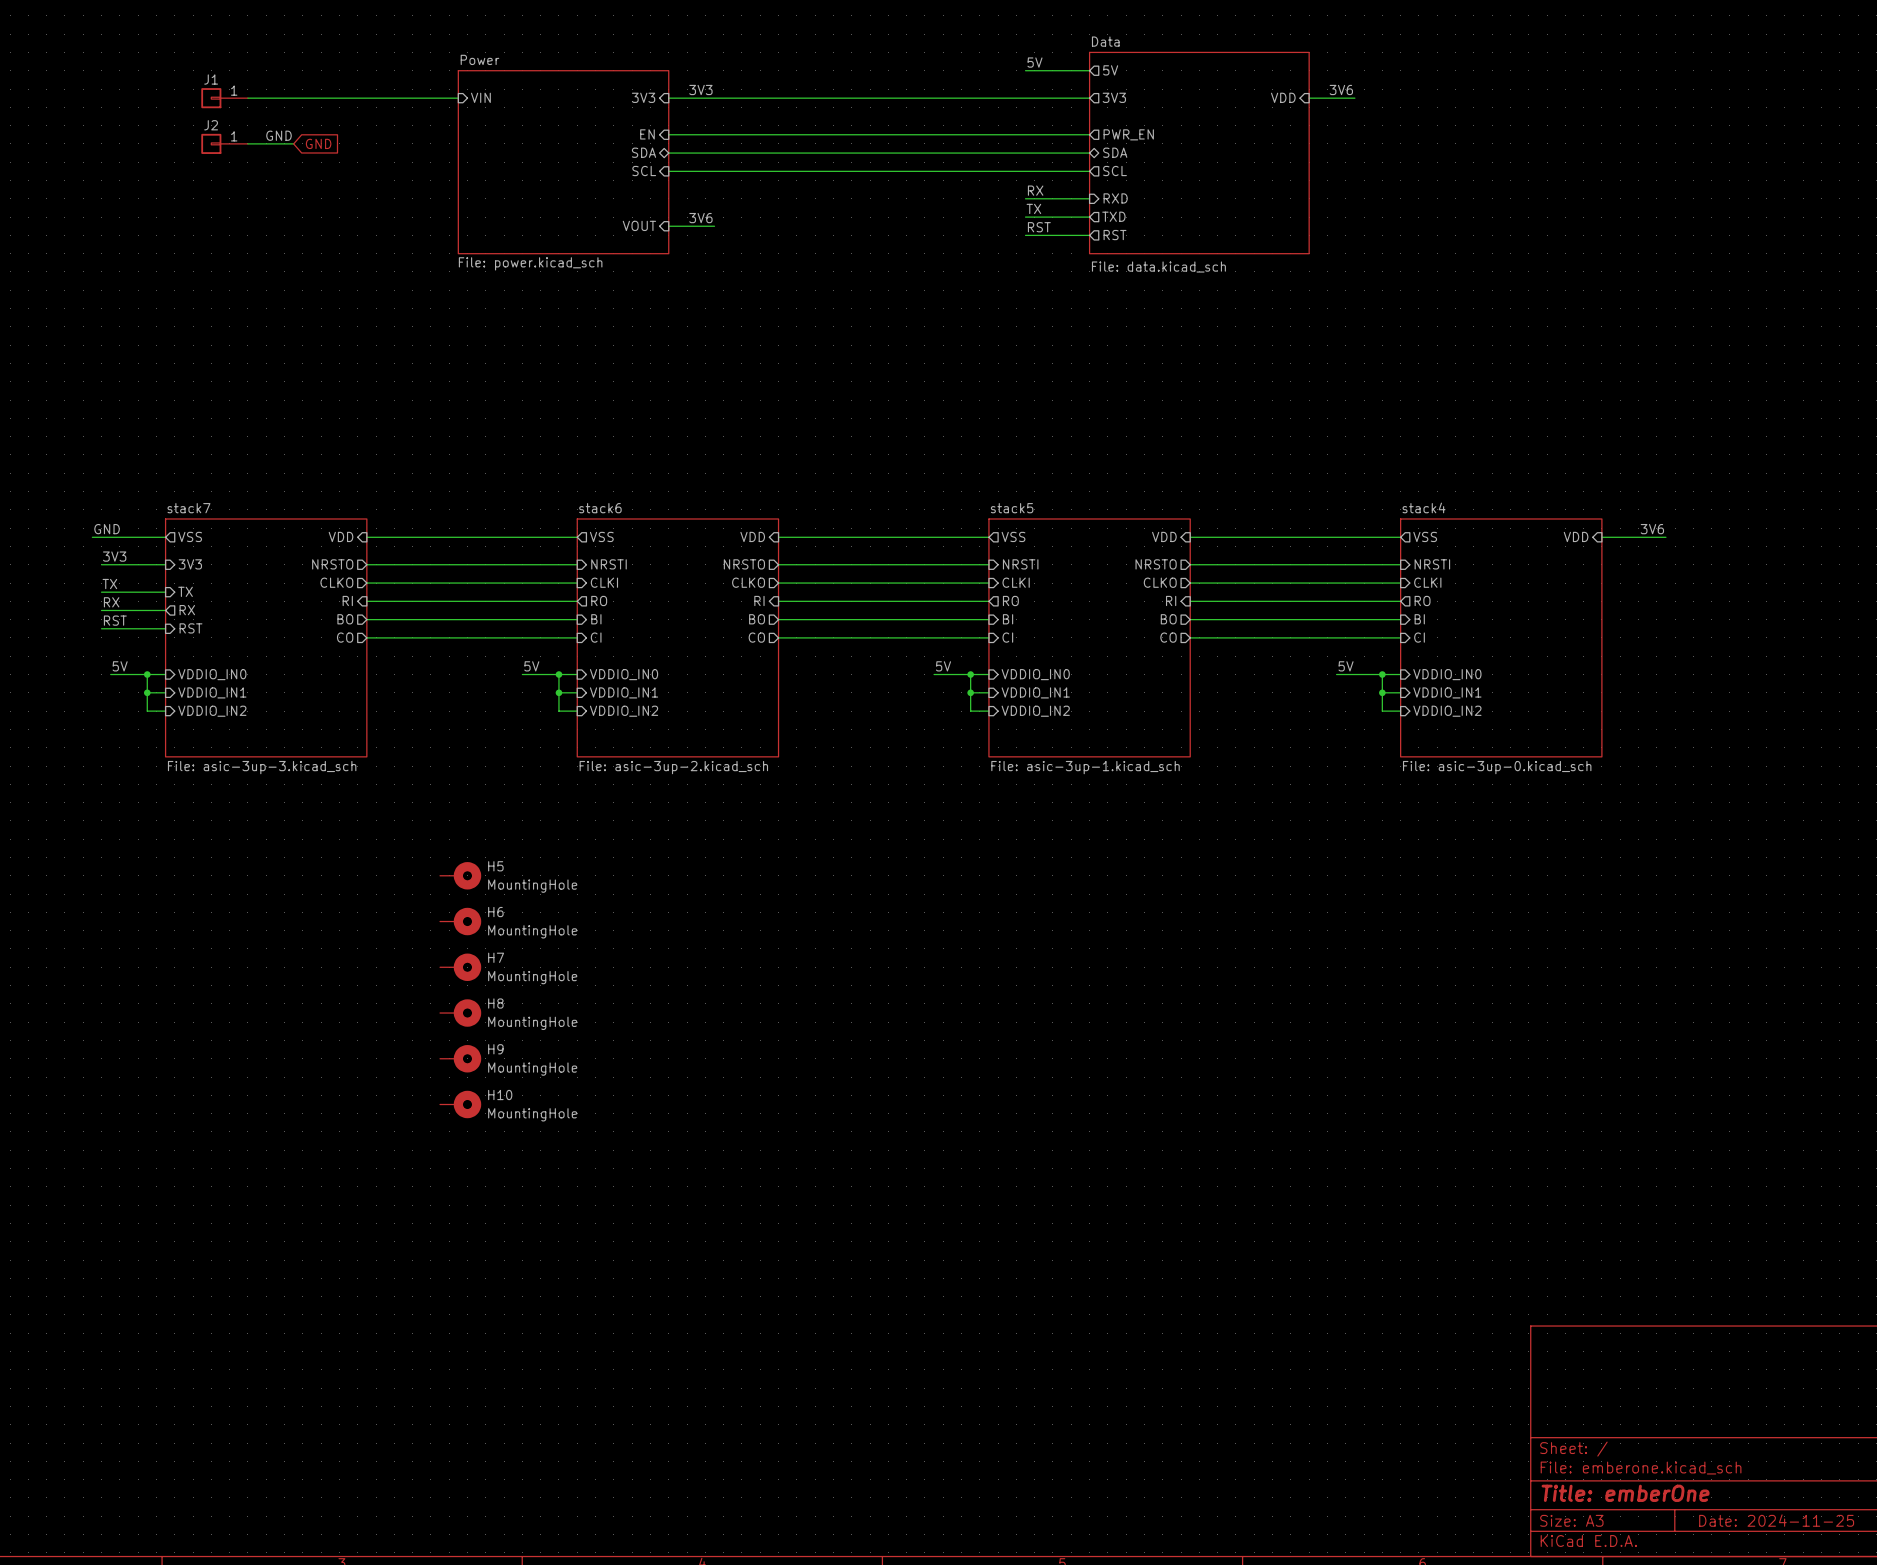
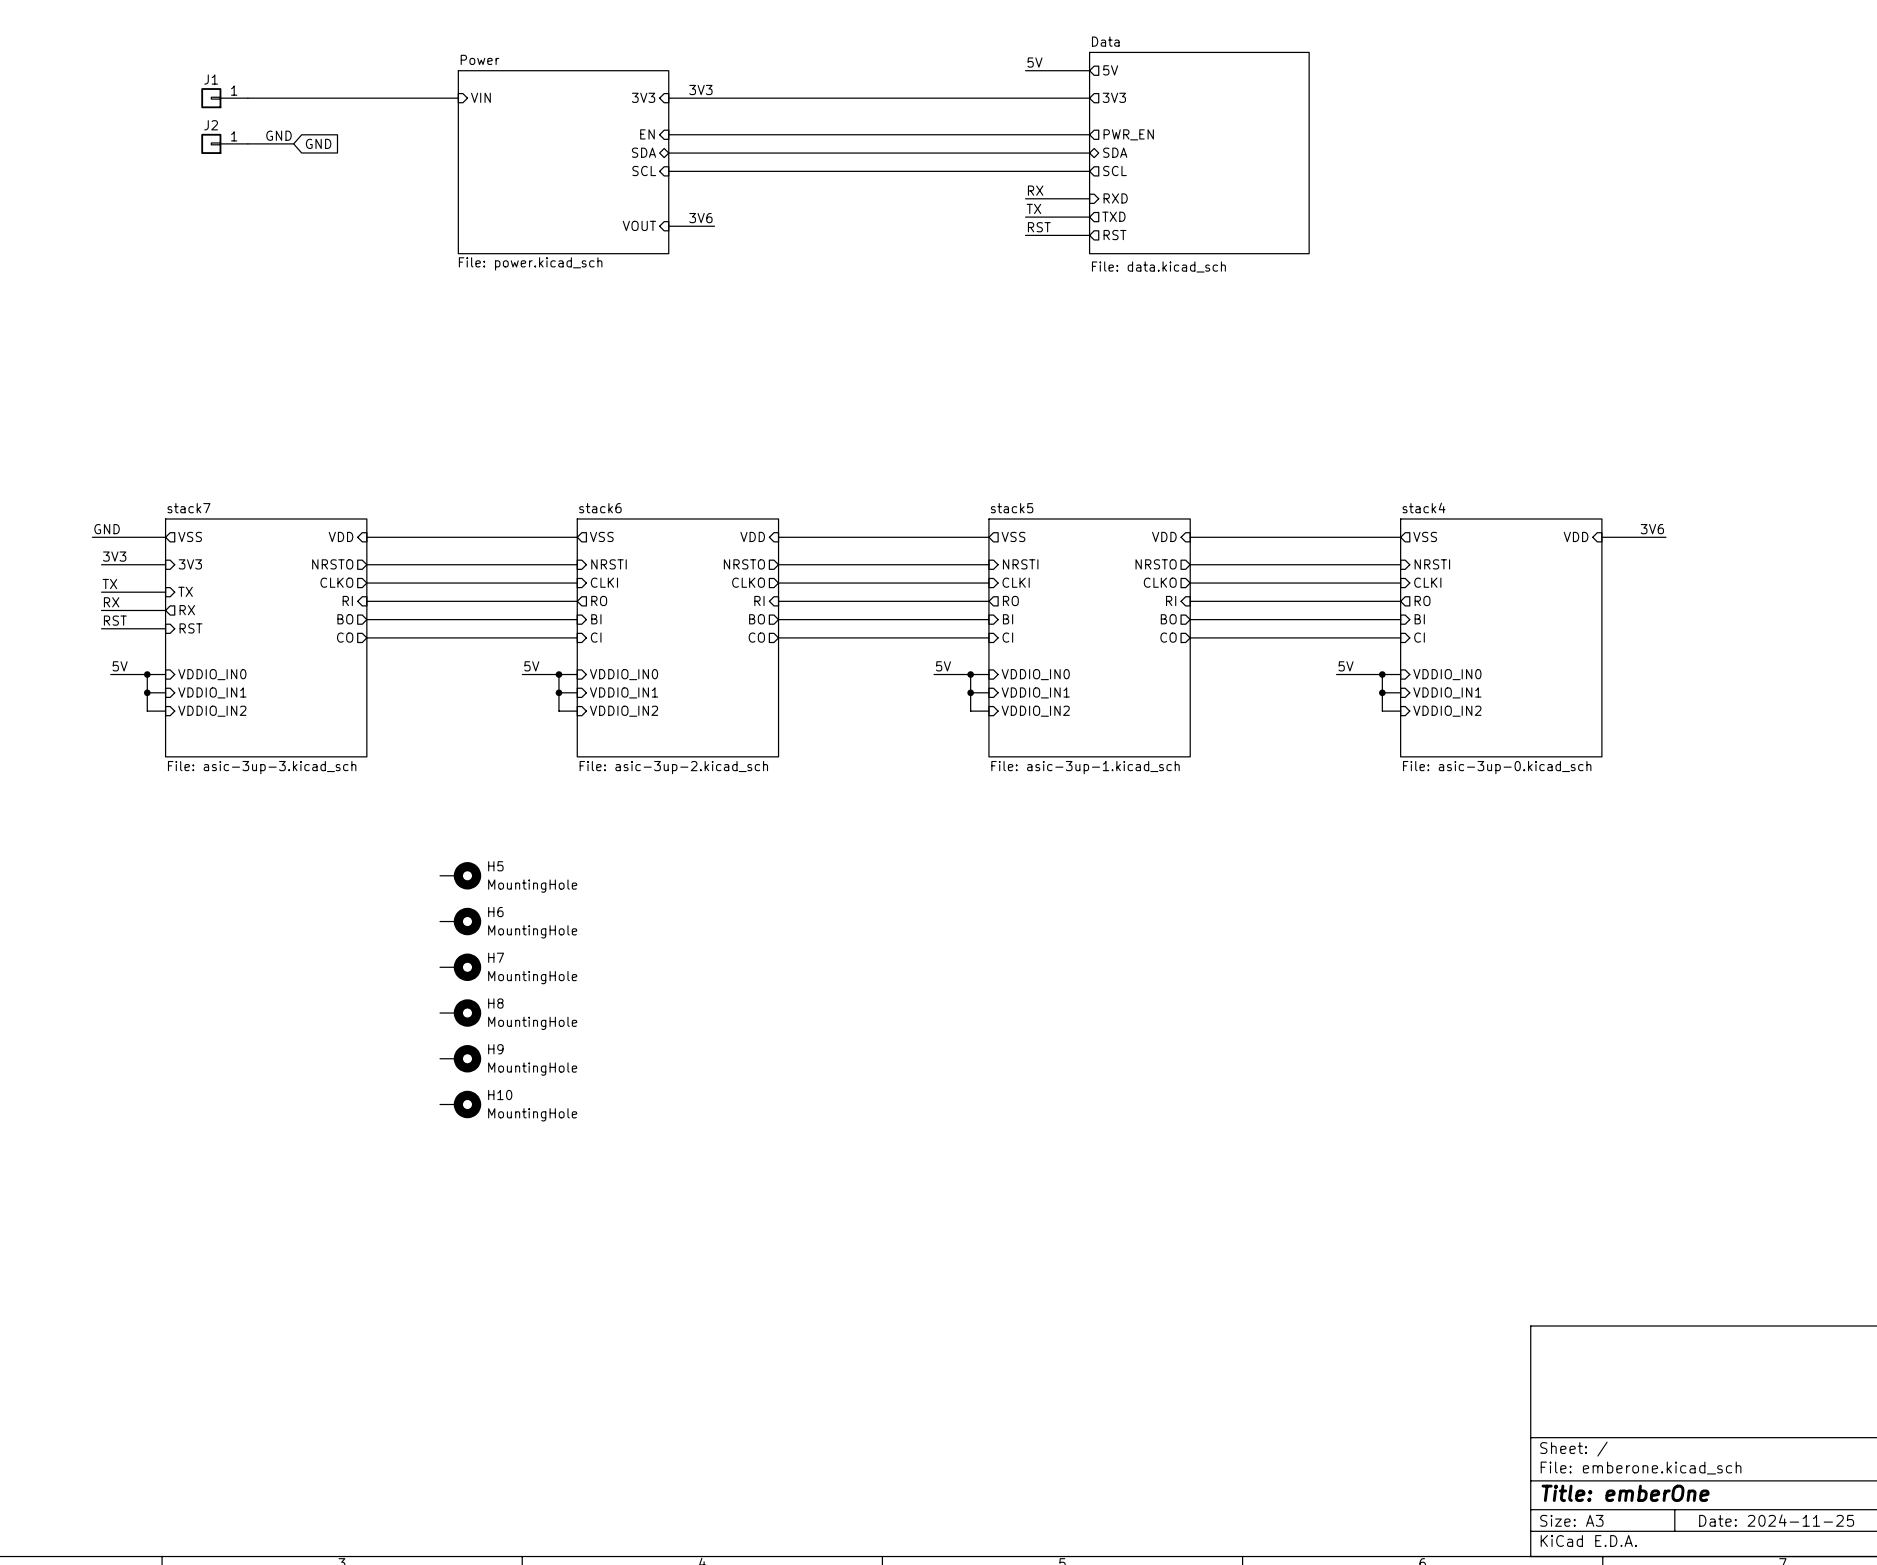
label: 3V6 (1341, 89) -> none
sheet pin: VDD (1283, 97) -> none
wire: (1309, 98) (1354, 98) -> none

